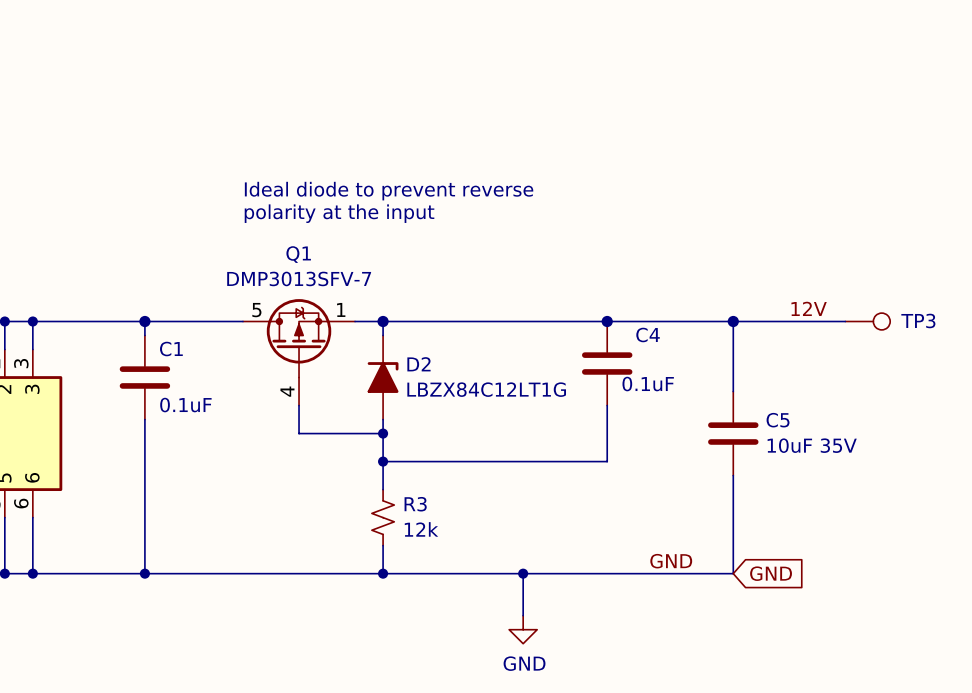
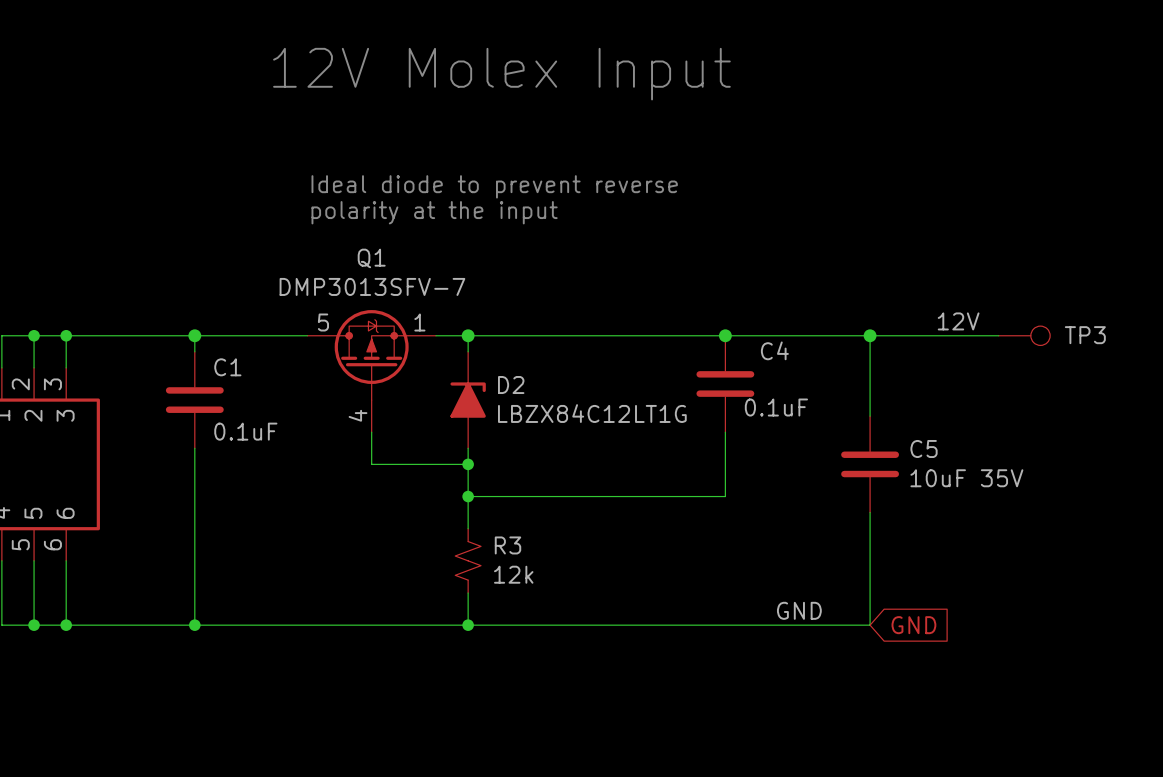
text: none -> 12V Molex Input (501, 74)
wire: (523, 573) (523, 615) -> none
junction: (523, 573) -> none
power symbol: GND (523, 629) -> none

